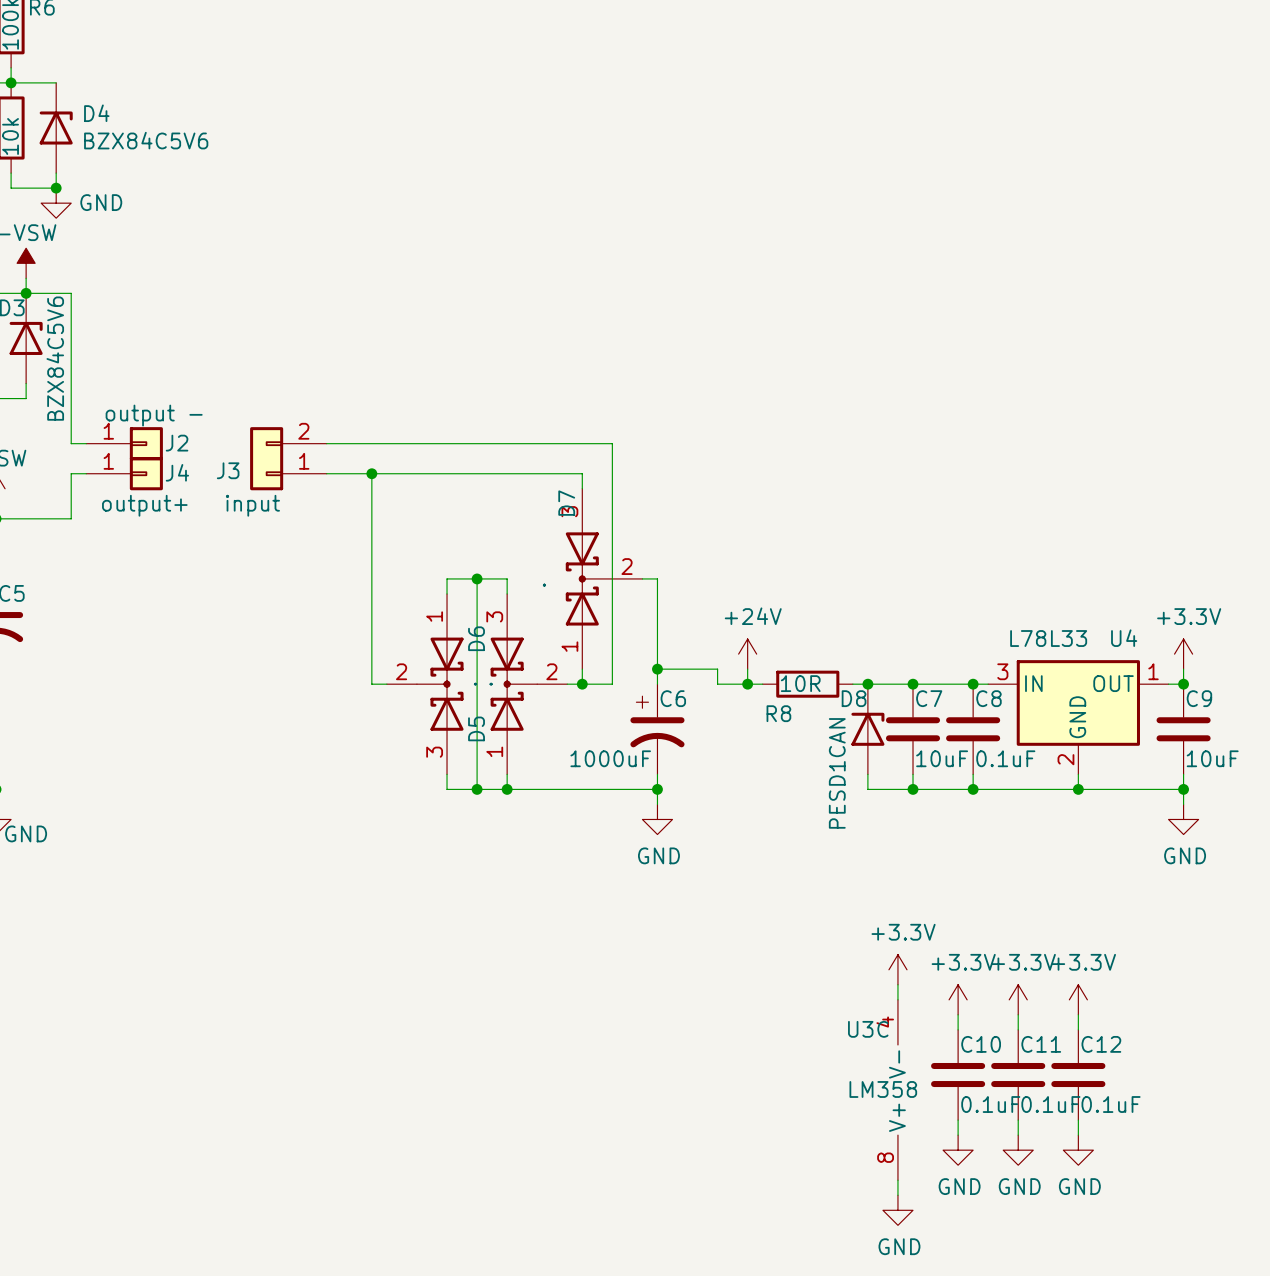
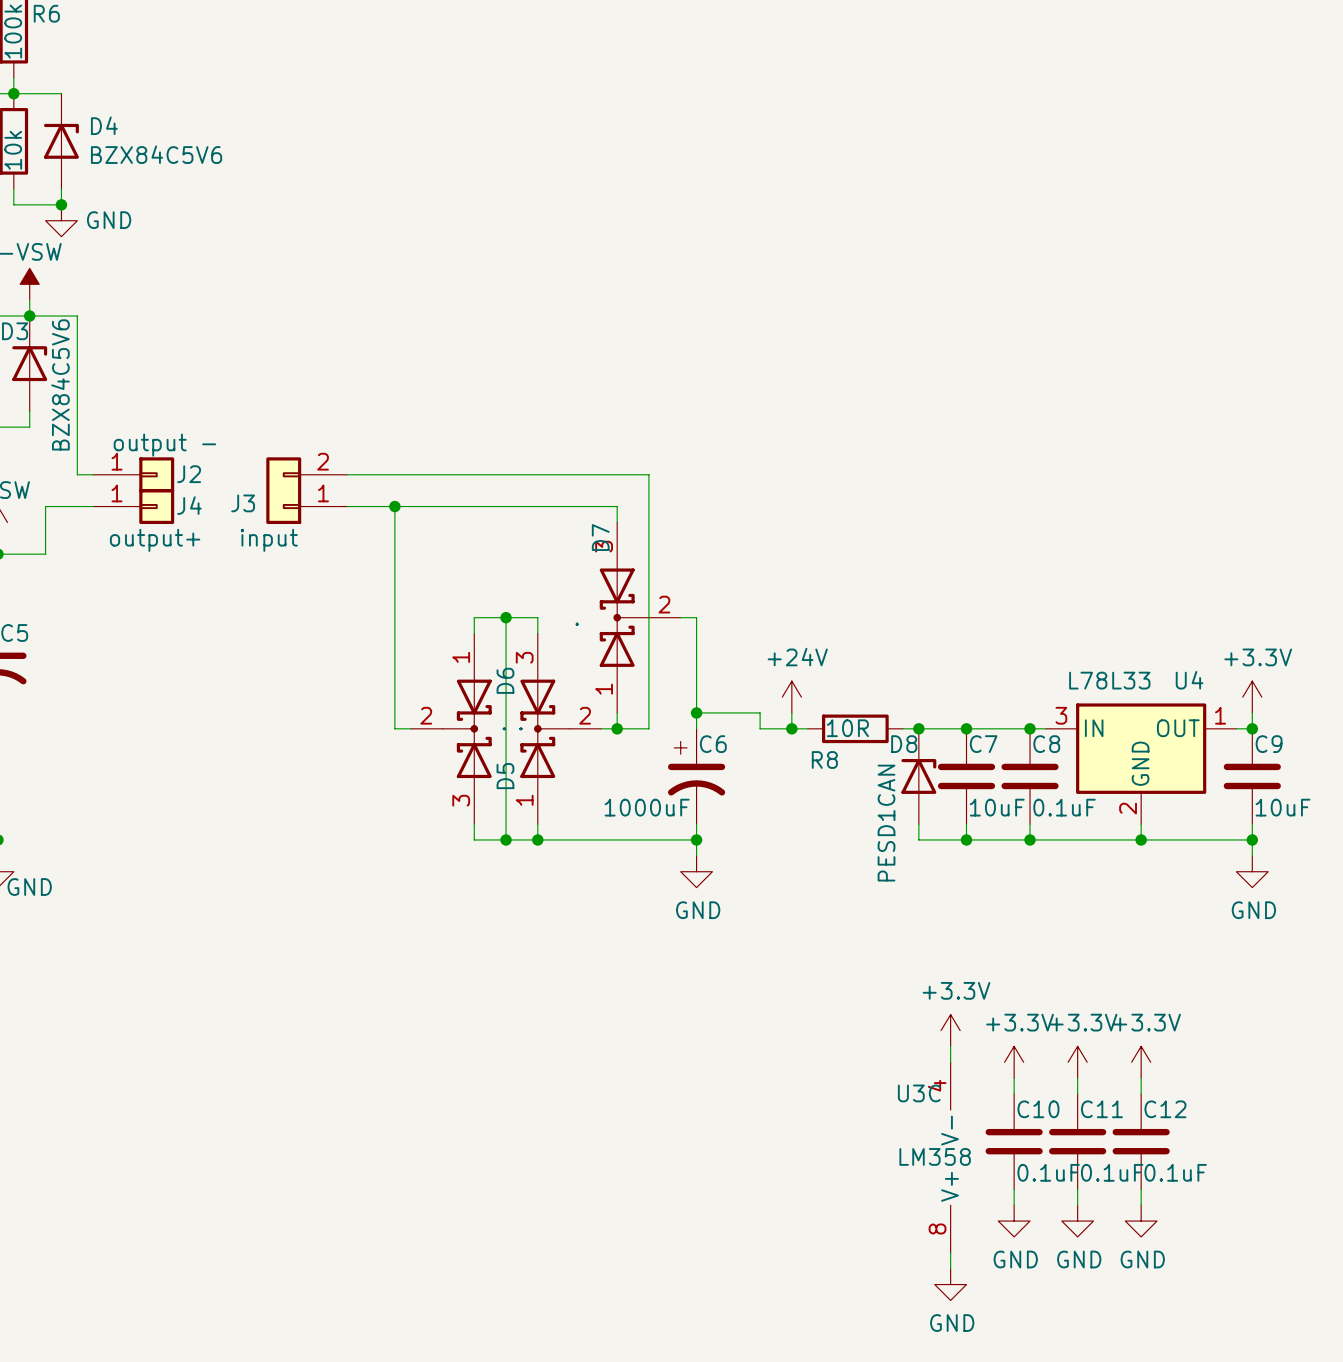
wire: (71, 473) (71, 518) (41, 518) -> (77, 506) (45, 506) (45, 554)

